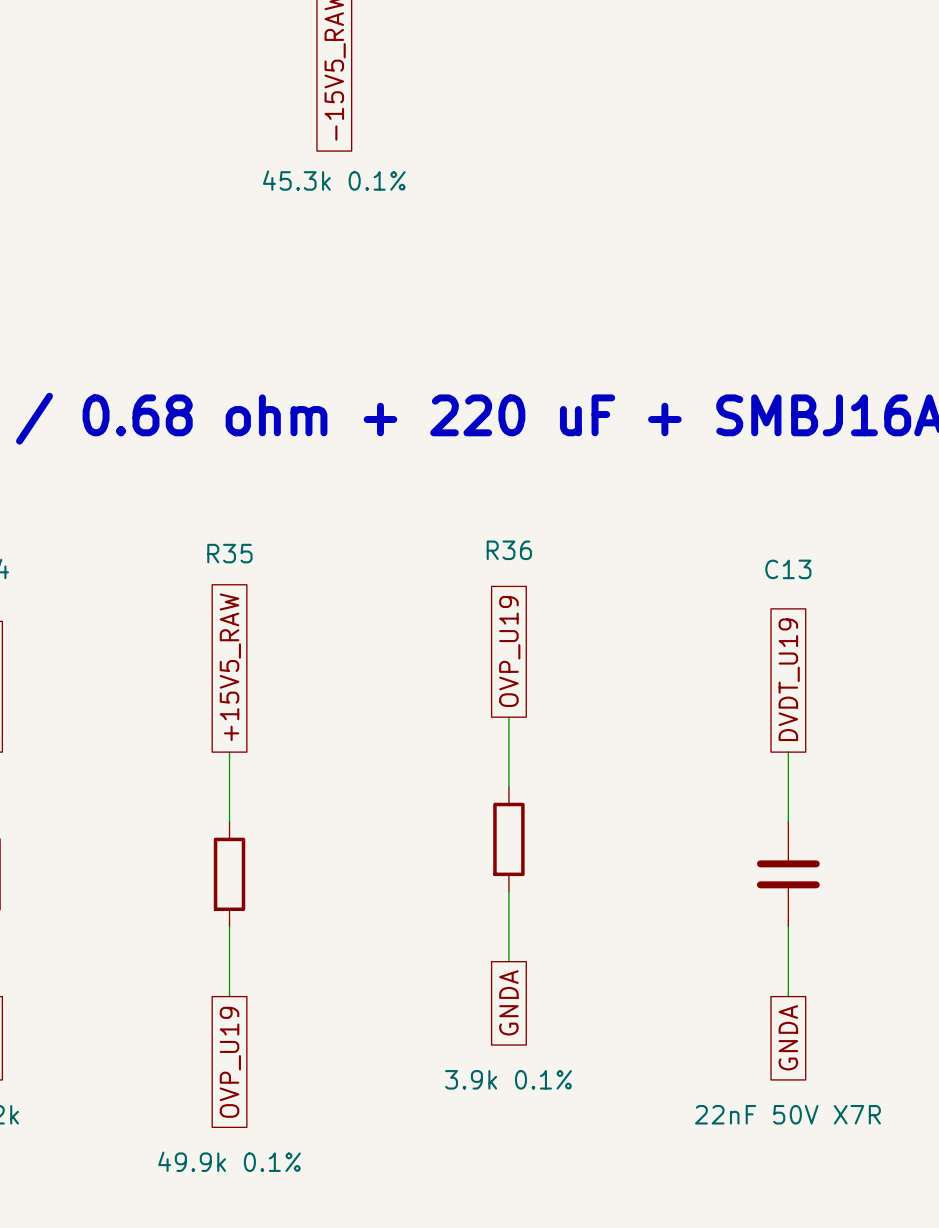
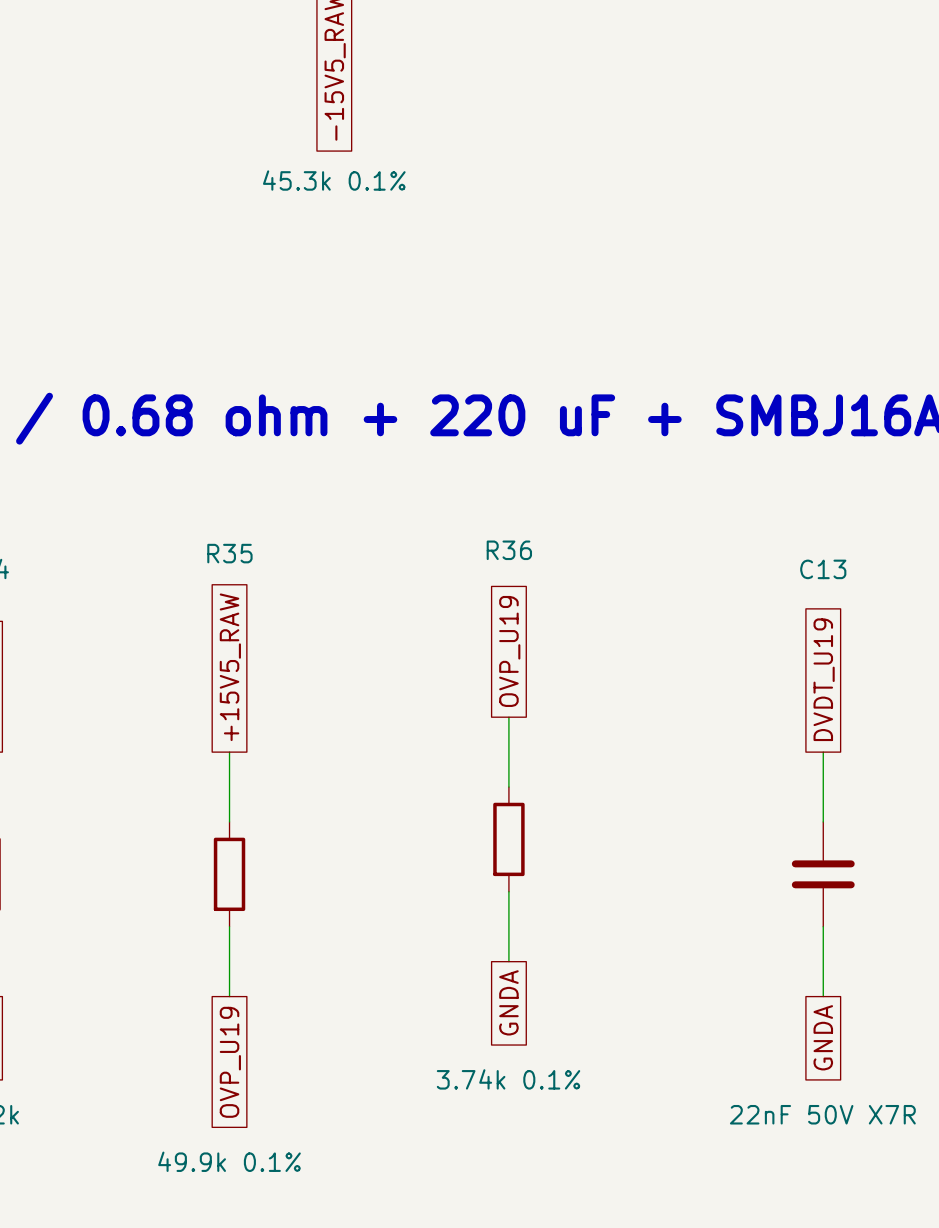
global label position: DVDT_U19 (789, 679) -> DVDT_U19 (824, 679)
wire: (788, 752) (788, 821) -> (823, 752) (823, 821)
C13 position: (788, 874) -> (823, 874)
wire: (788, 926) (788, 996) -> (823, 926) (823, 996)
global label position: GNDA (788, 1037) -> GNDA (823, 1037)
R36 value: 3.9k 0.1% (508, 1079) -> 3.74k 0.1% (508, 1079)

